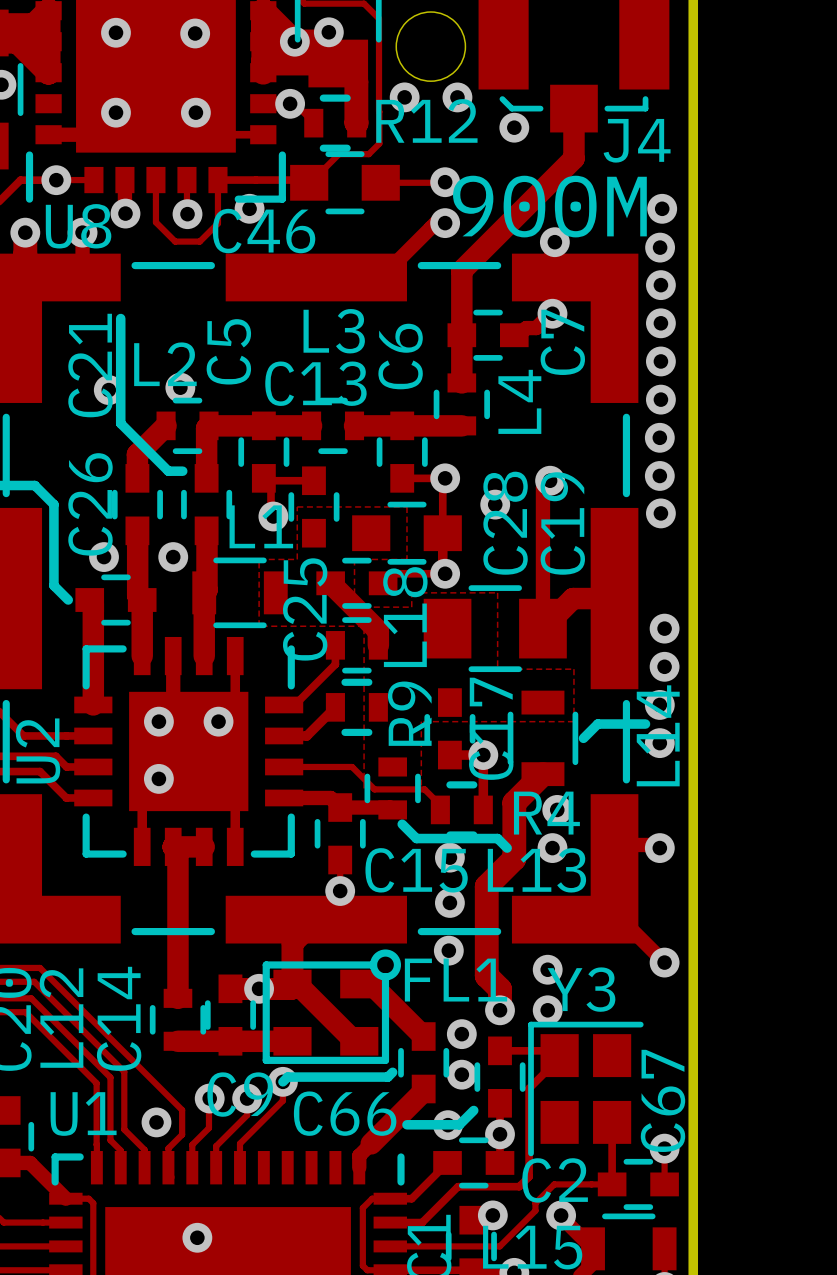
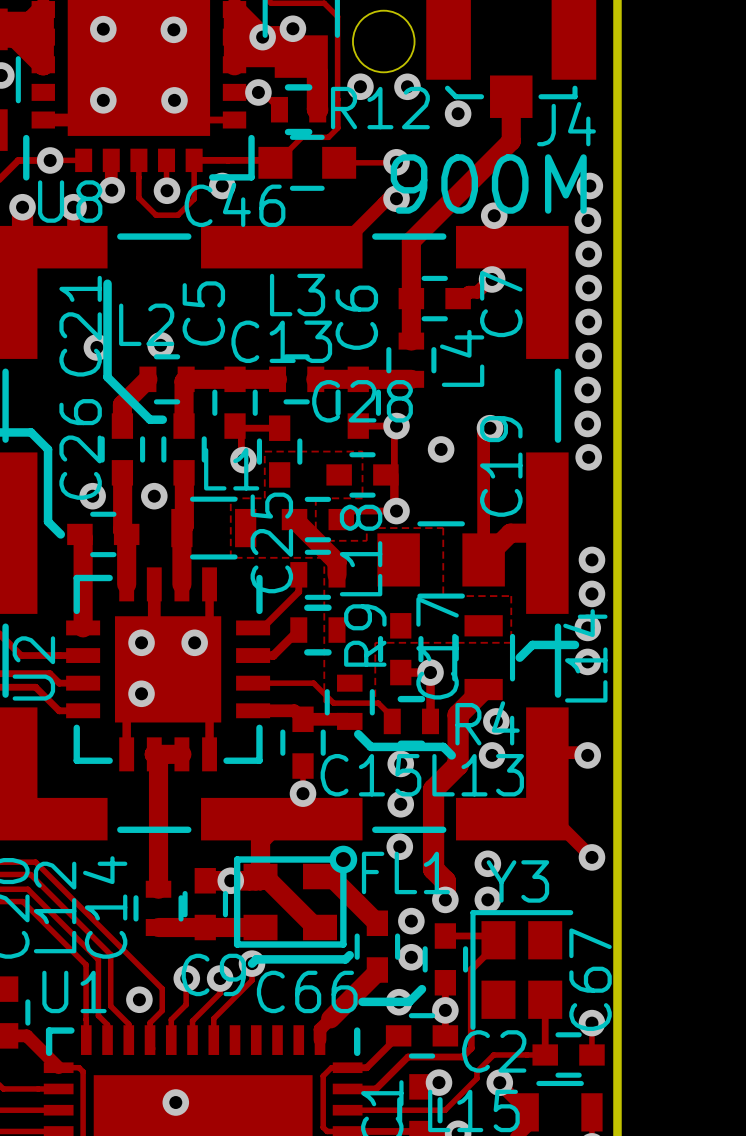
C28 footprint: [352, 501, 462, 565] -> [326, 452, 399, 498]
C28 name rotation: 0° (505, 523) -> 90° clockwise (362, 401)

